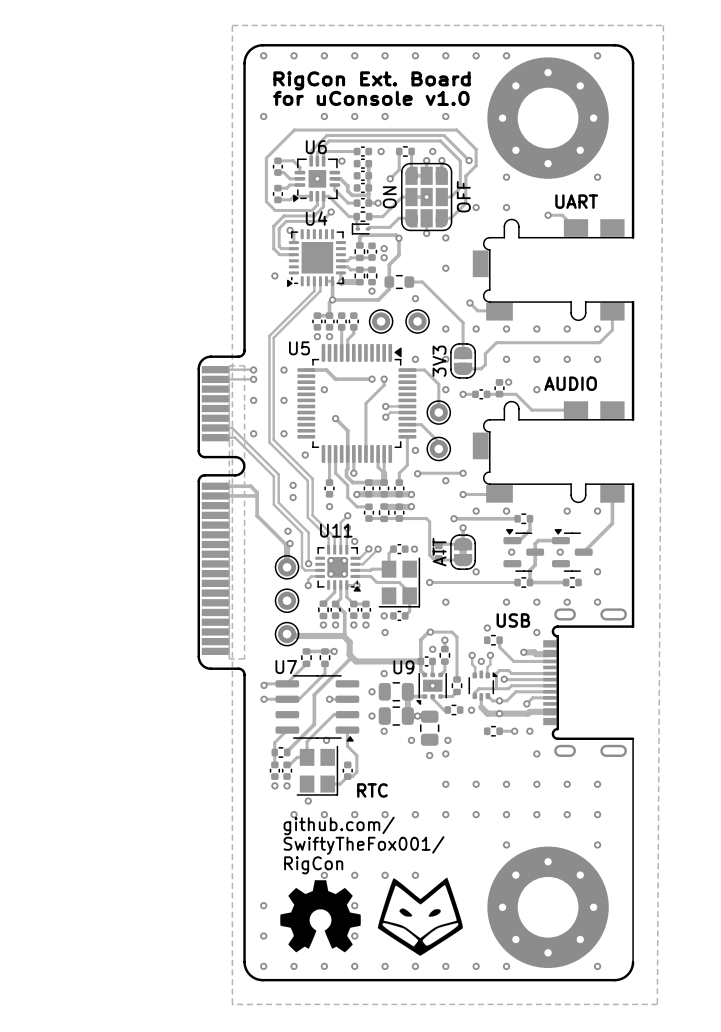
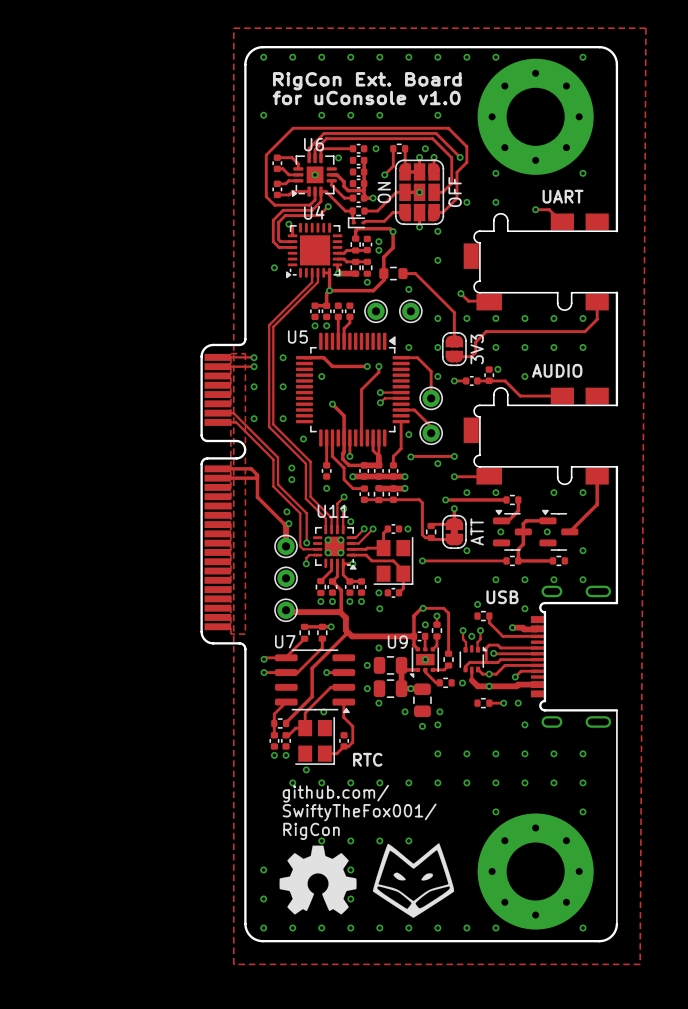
part value position: 3V3 (439, 361) -> 3V3 (477, 349)
part value position: ATT (439, 552) -> ATT (477, 531)

